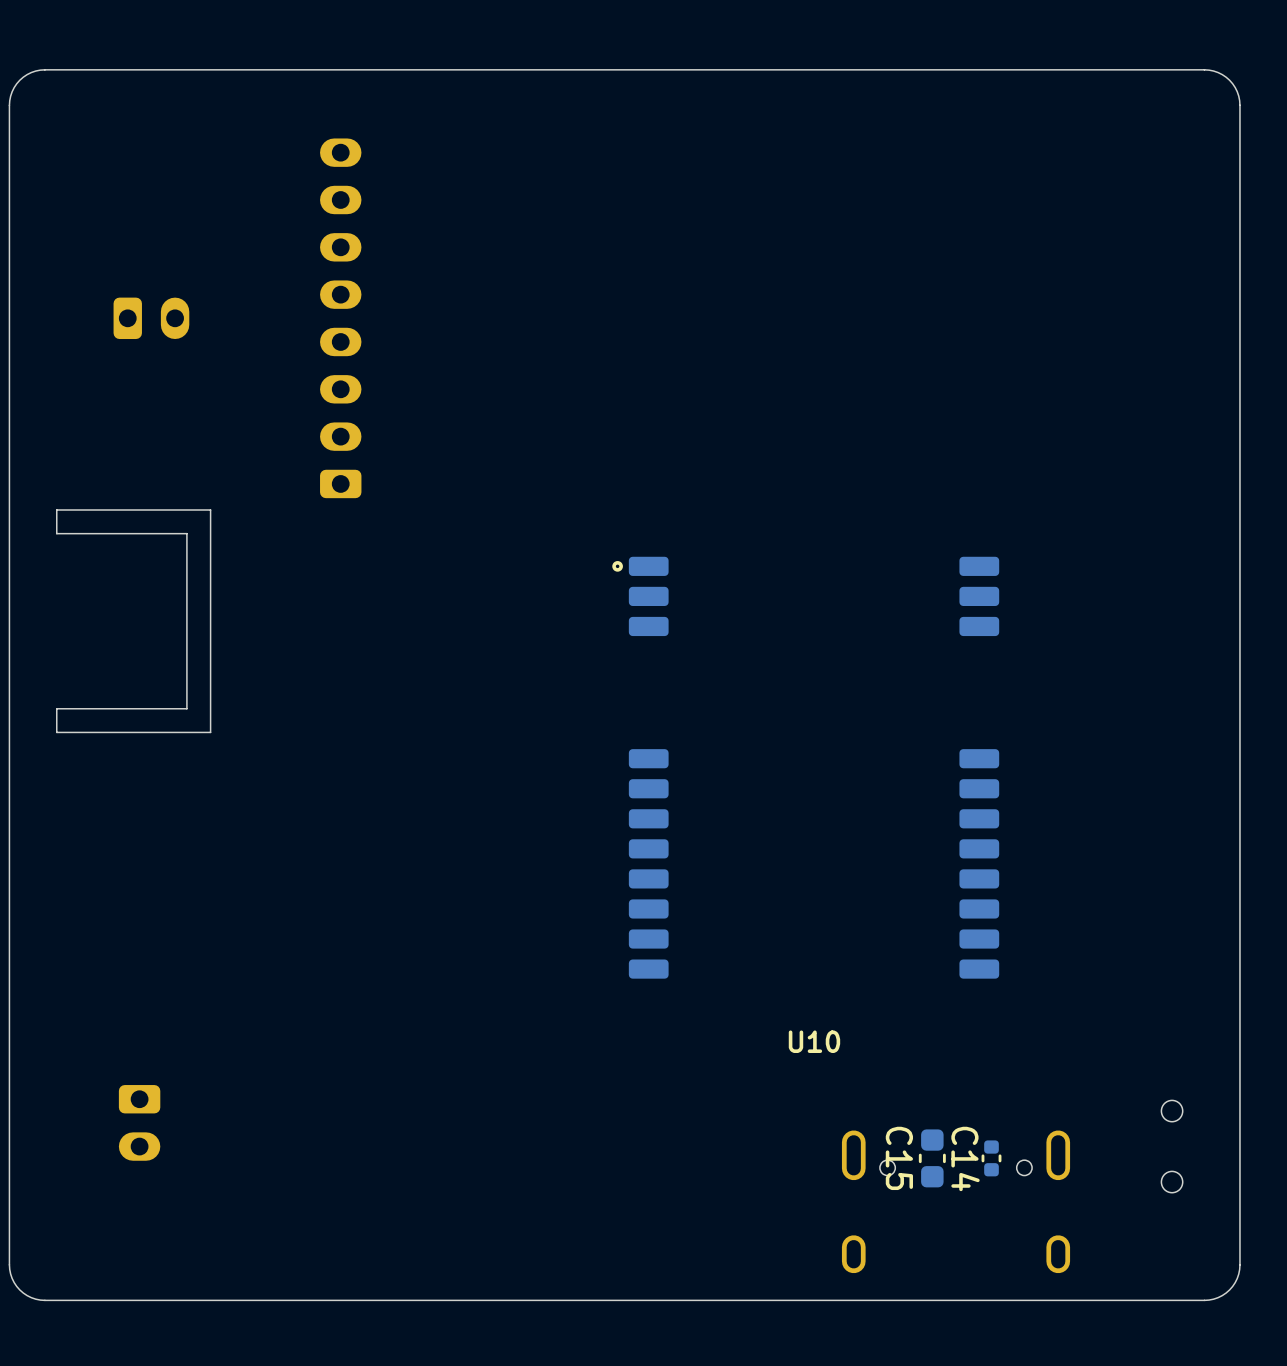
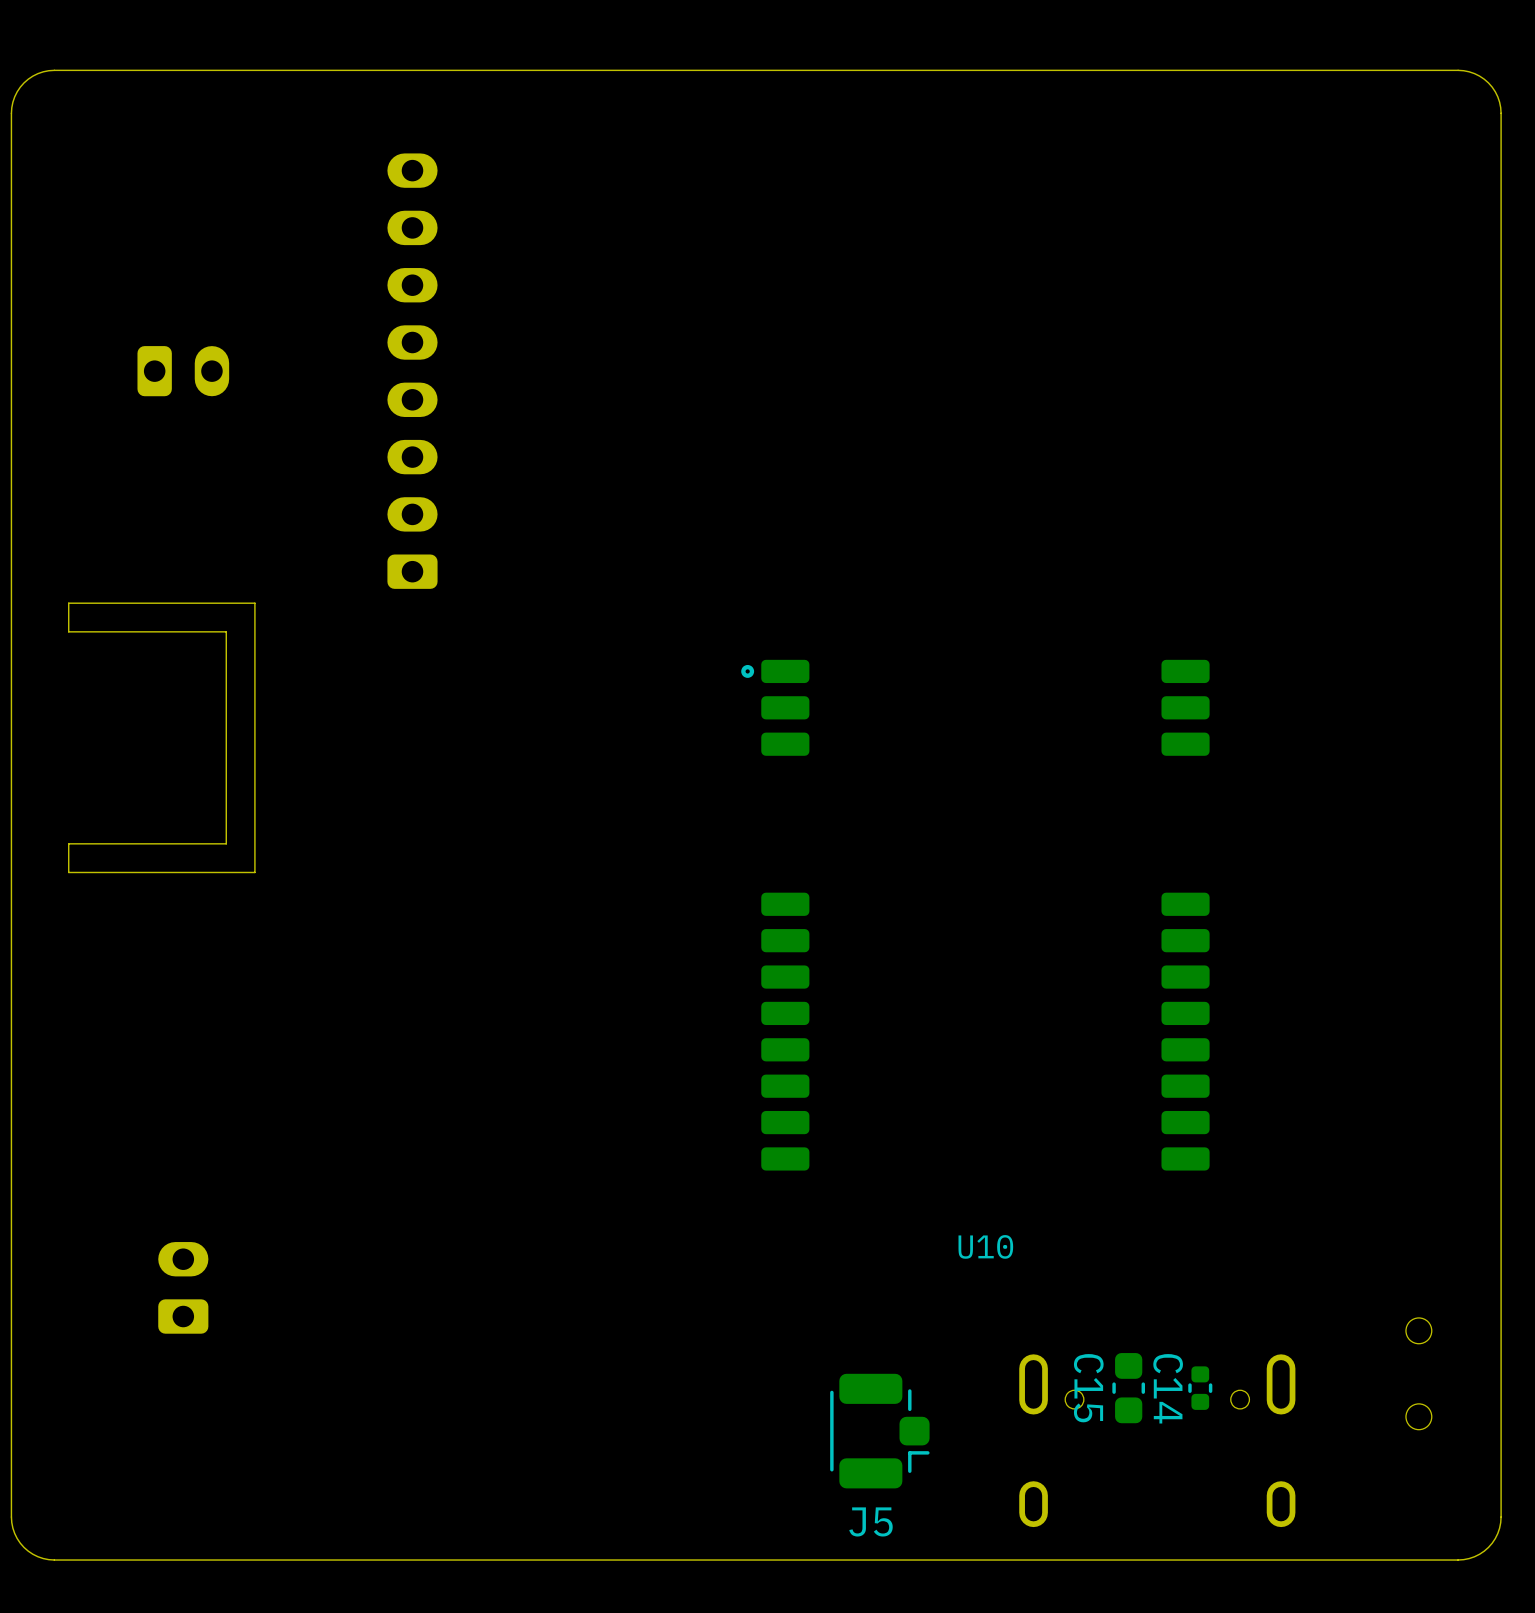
part rotation: 0° (139, 1122) -> 180° (183, 1287)
part position: (139, 1122) -> (183, 1287)
J5: none -> (879, 1431)

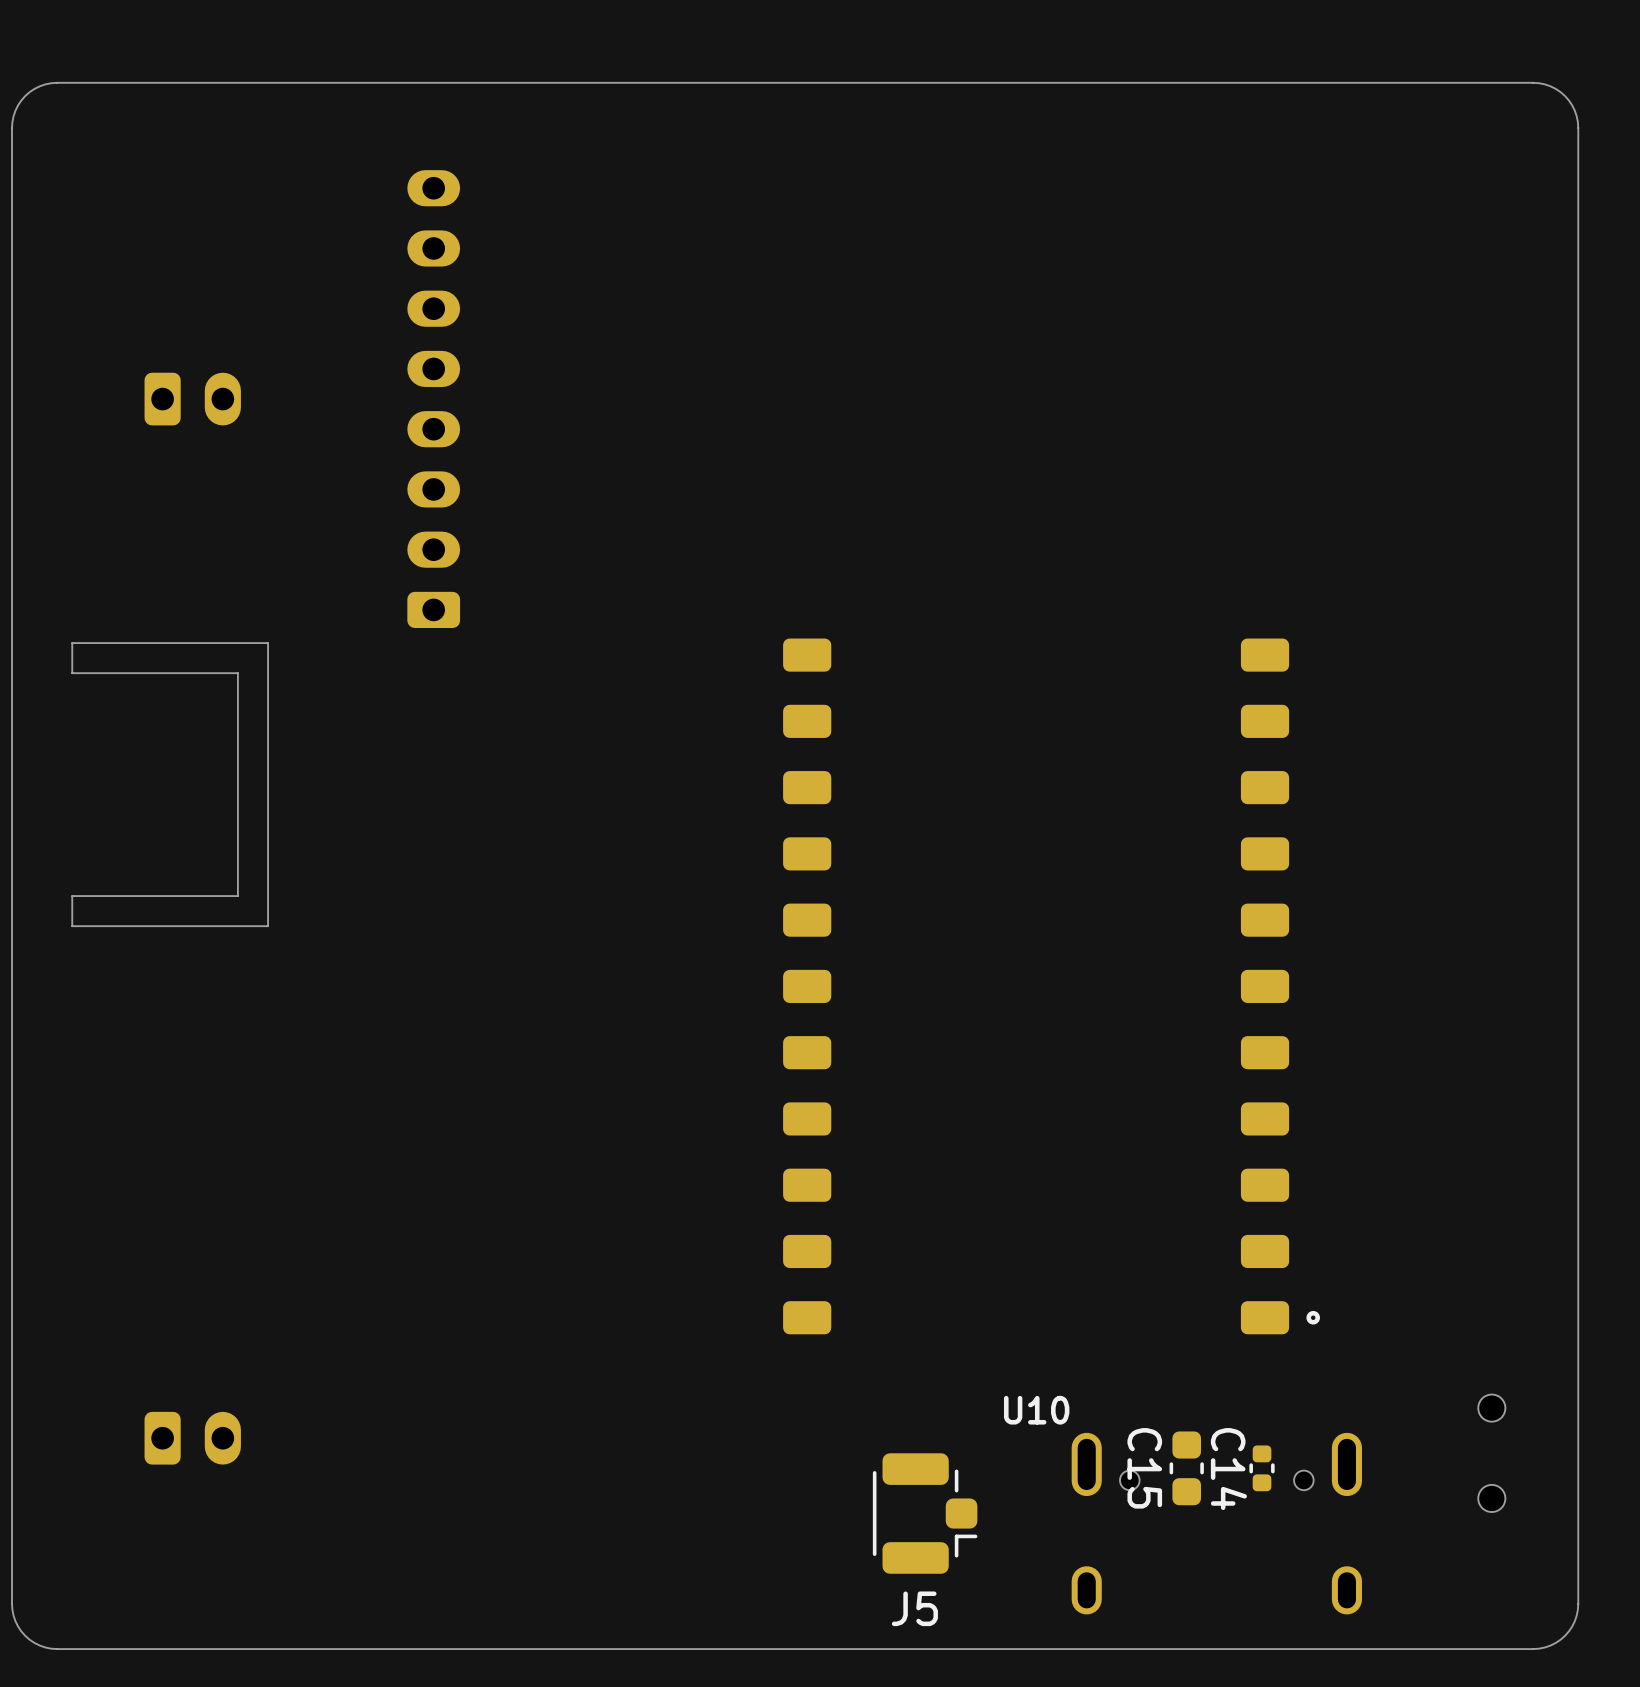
U10 footprint: [741, 659, 1210, 1171] -> [783, 638, 1320, 1335]
U10 name position: U10 (985, 1246) -> U10 (1036, 1410)
part rotation: 0° (183, 1287) -> 90° clockwise (192, 1438)
part position: (183, 1287) -> (192, 1438)

